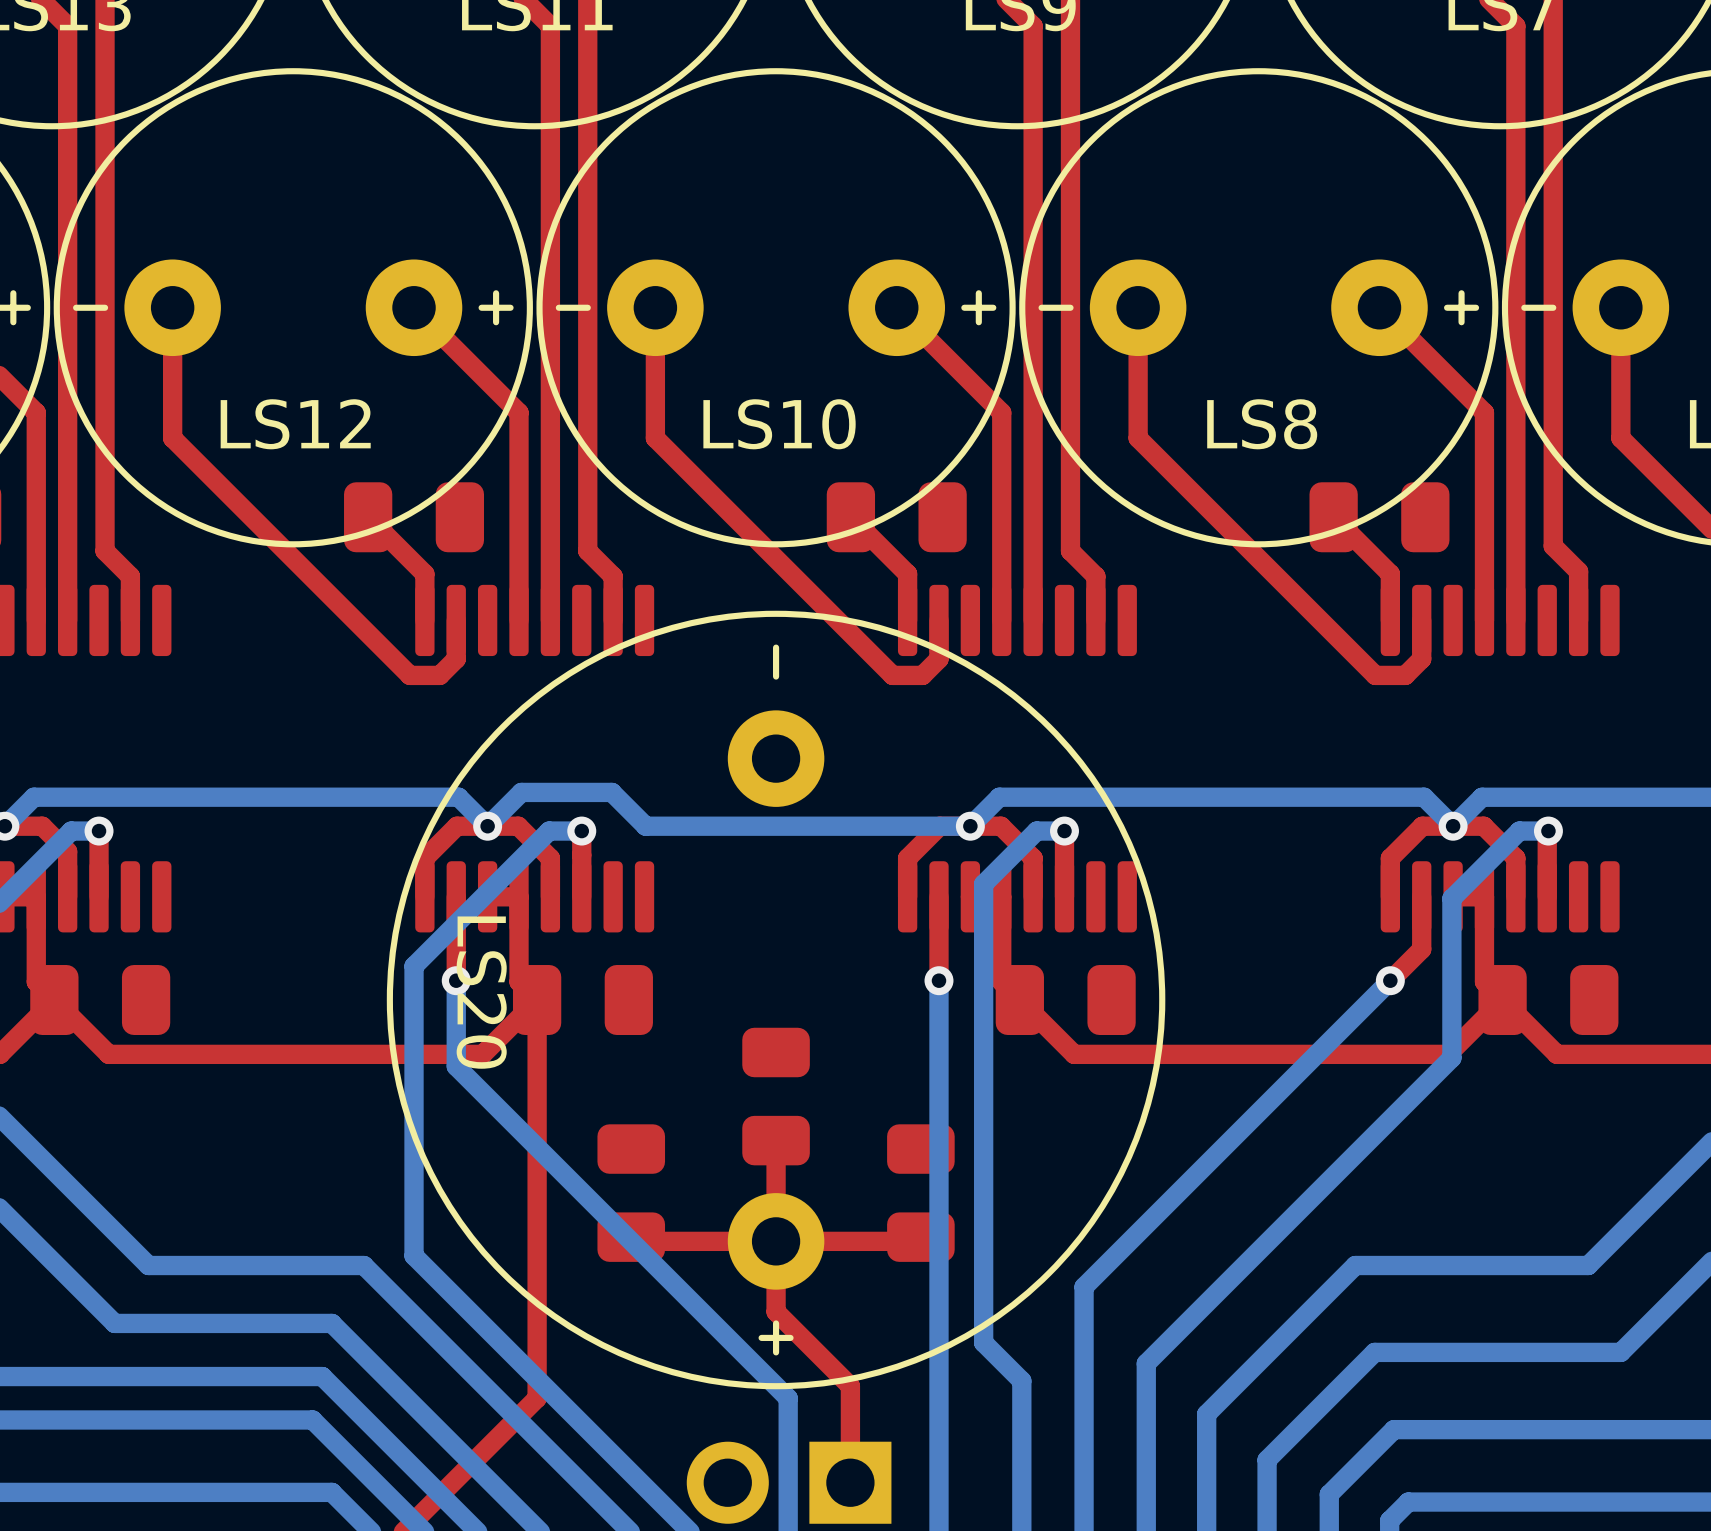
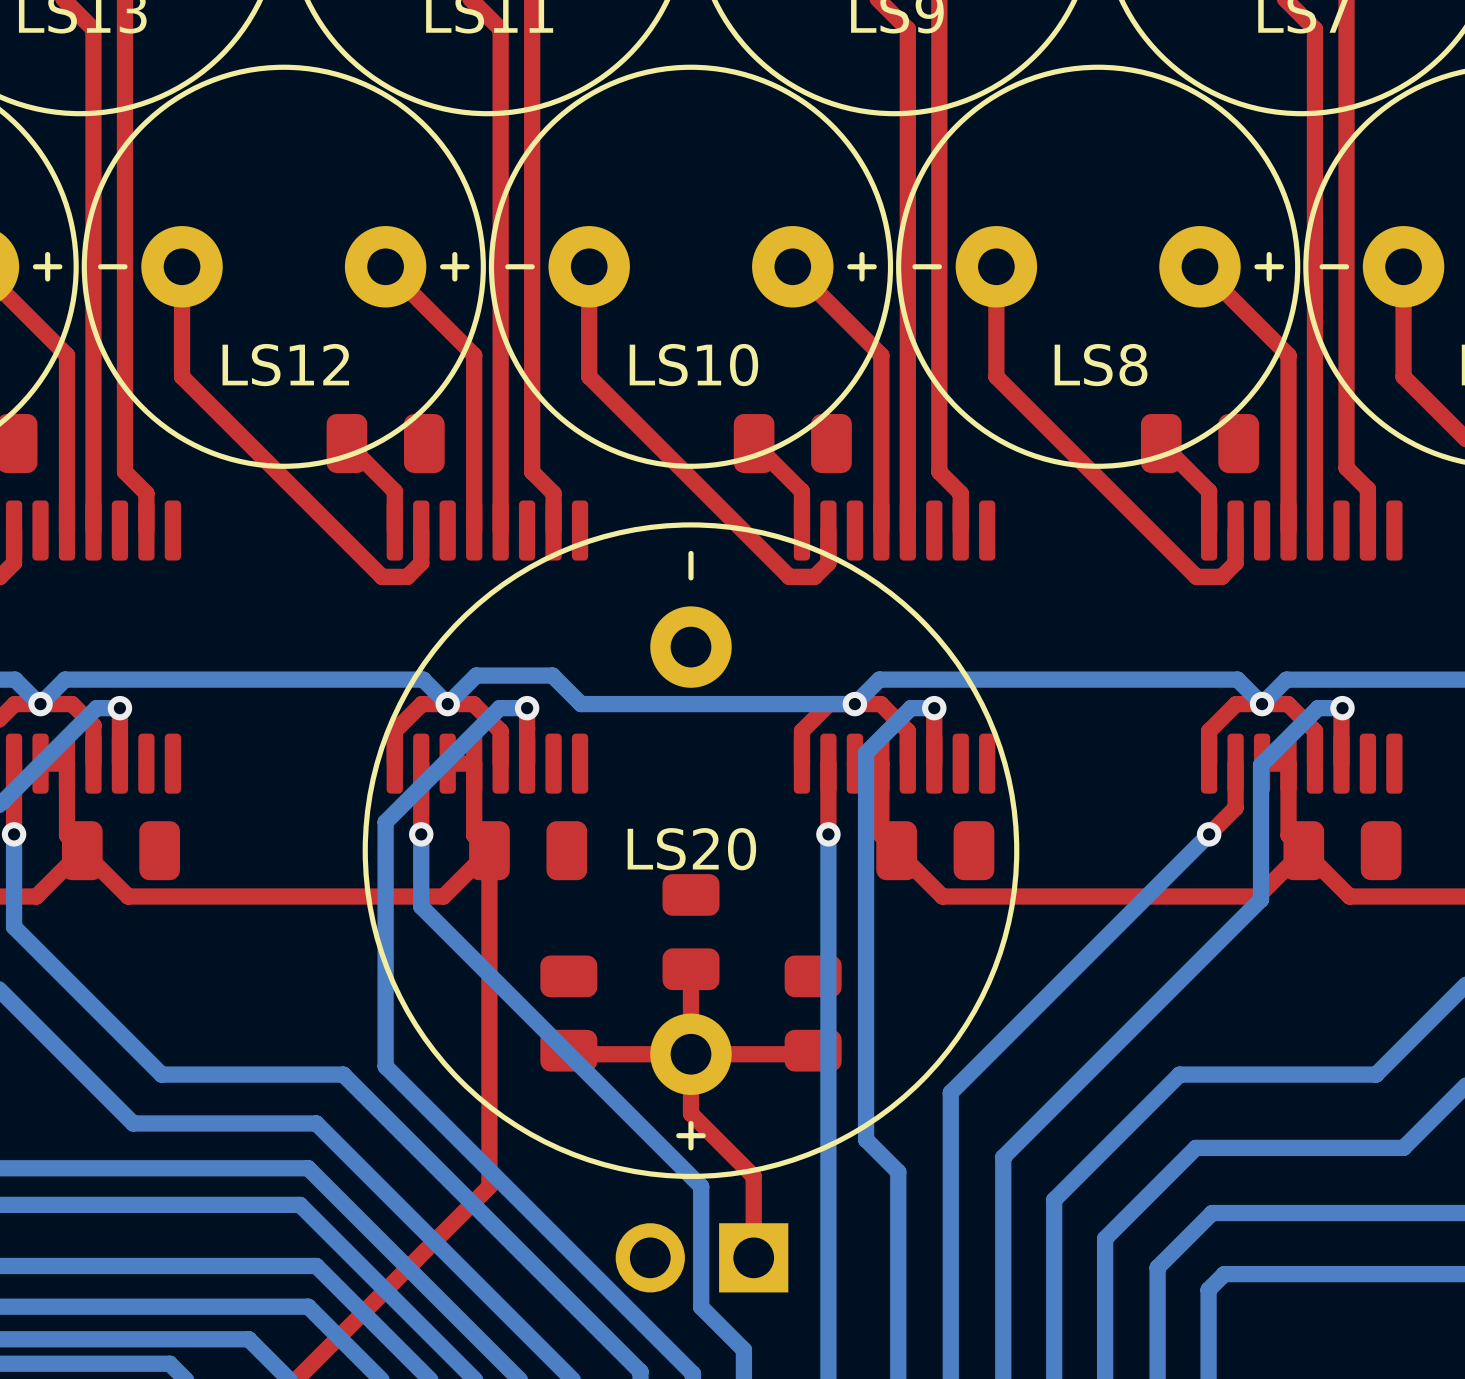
LS20 name rotation: 0° (481, 992) -> 90° counterclockwise (691, 849)
LS20 name position: LS20 (481, 992) -> LS20 (691, 849)

